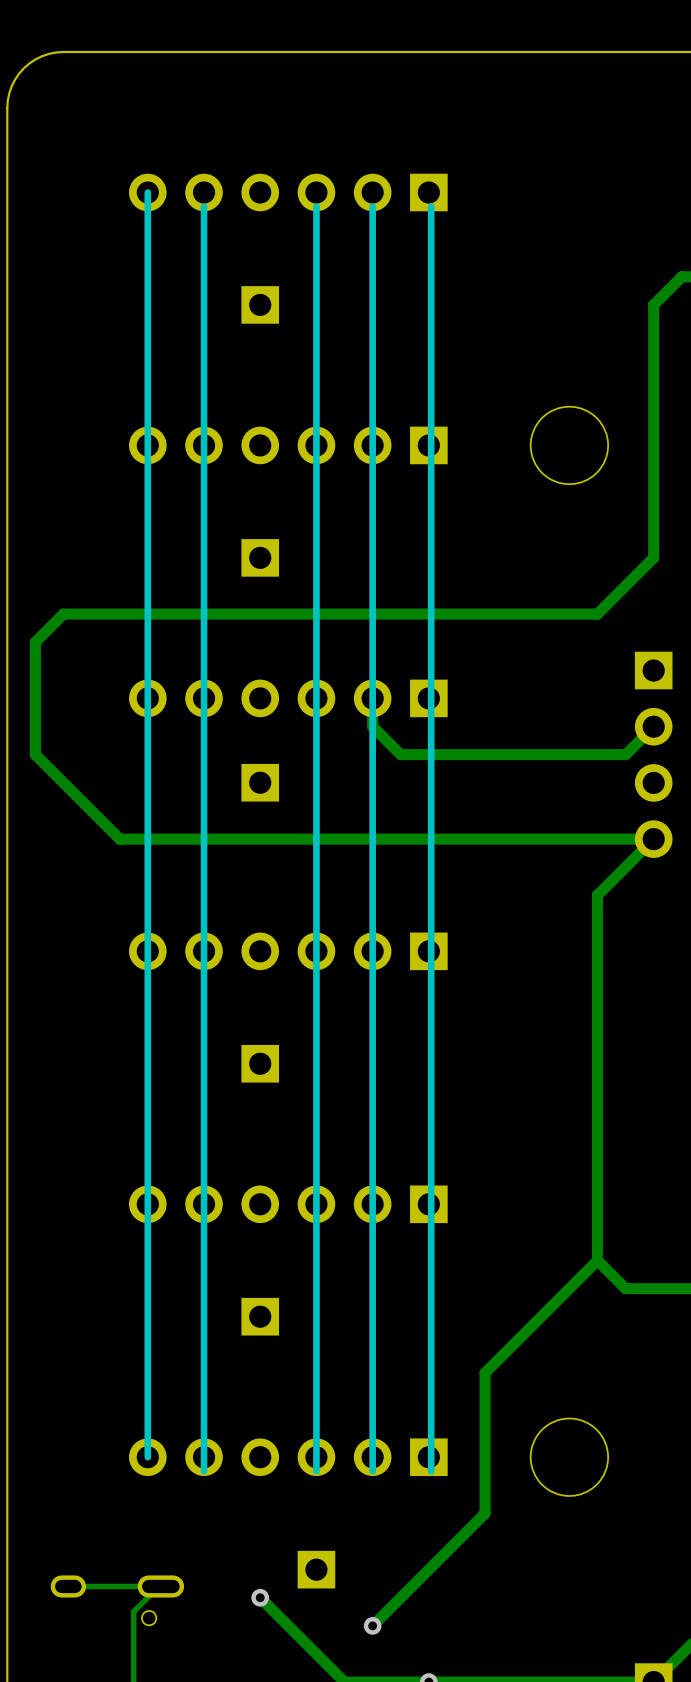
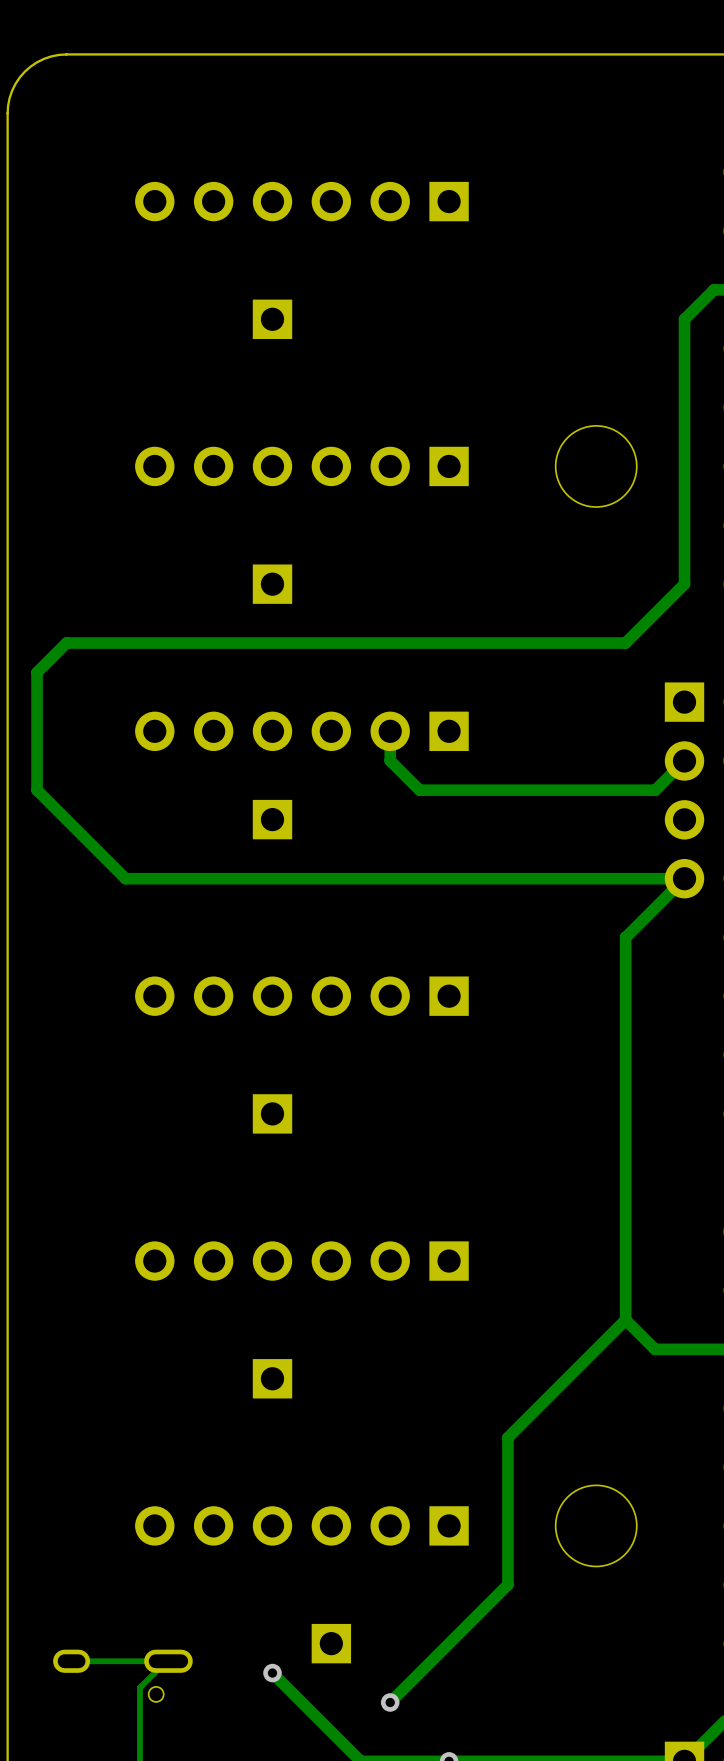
line: (147, 192) (147, 1457) -> none
line: (204, 206) (204, 1471) -> none
line: (316, 206) (316, 1471) -> none
line: (372, 206) (372, 1471) -> none
line: (431, 206) (431, 1471) -> none

